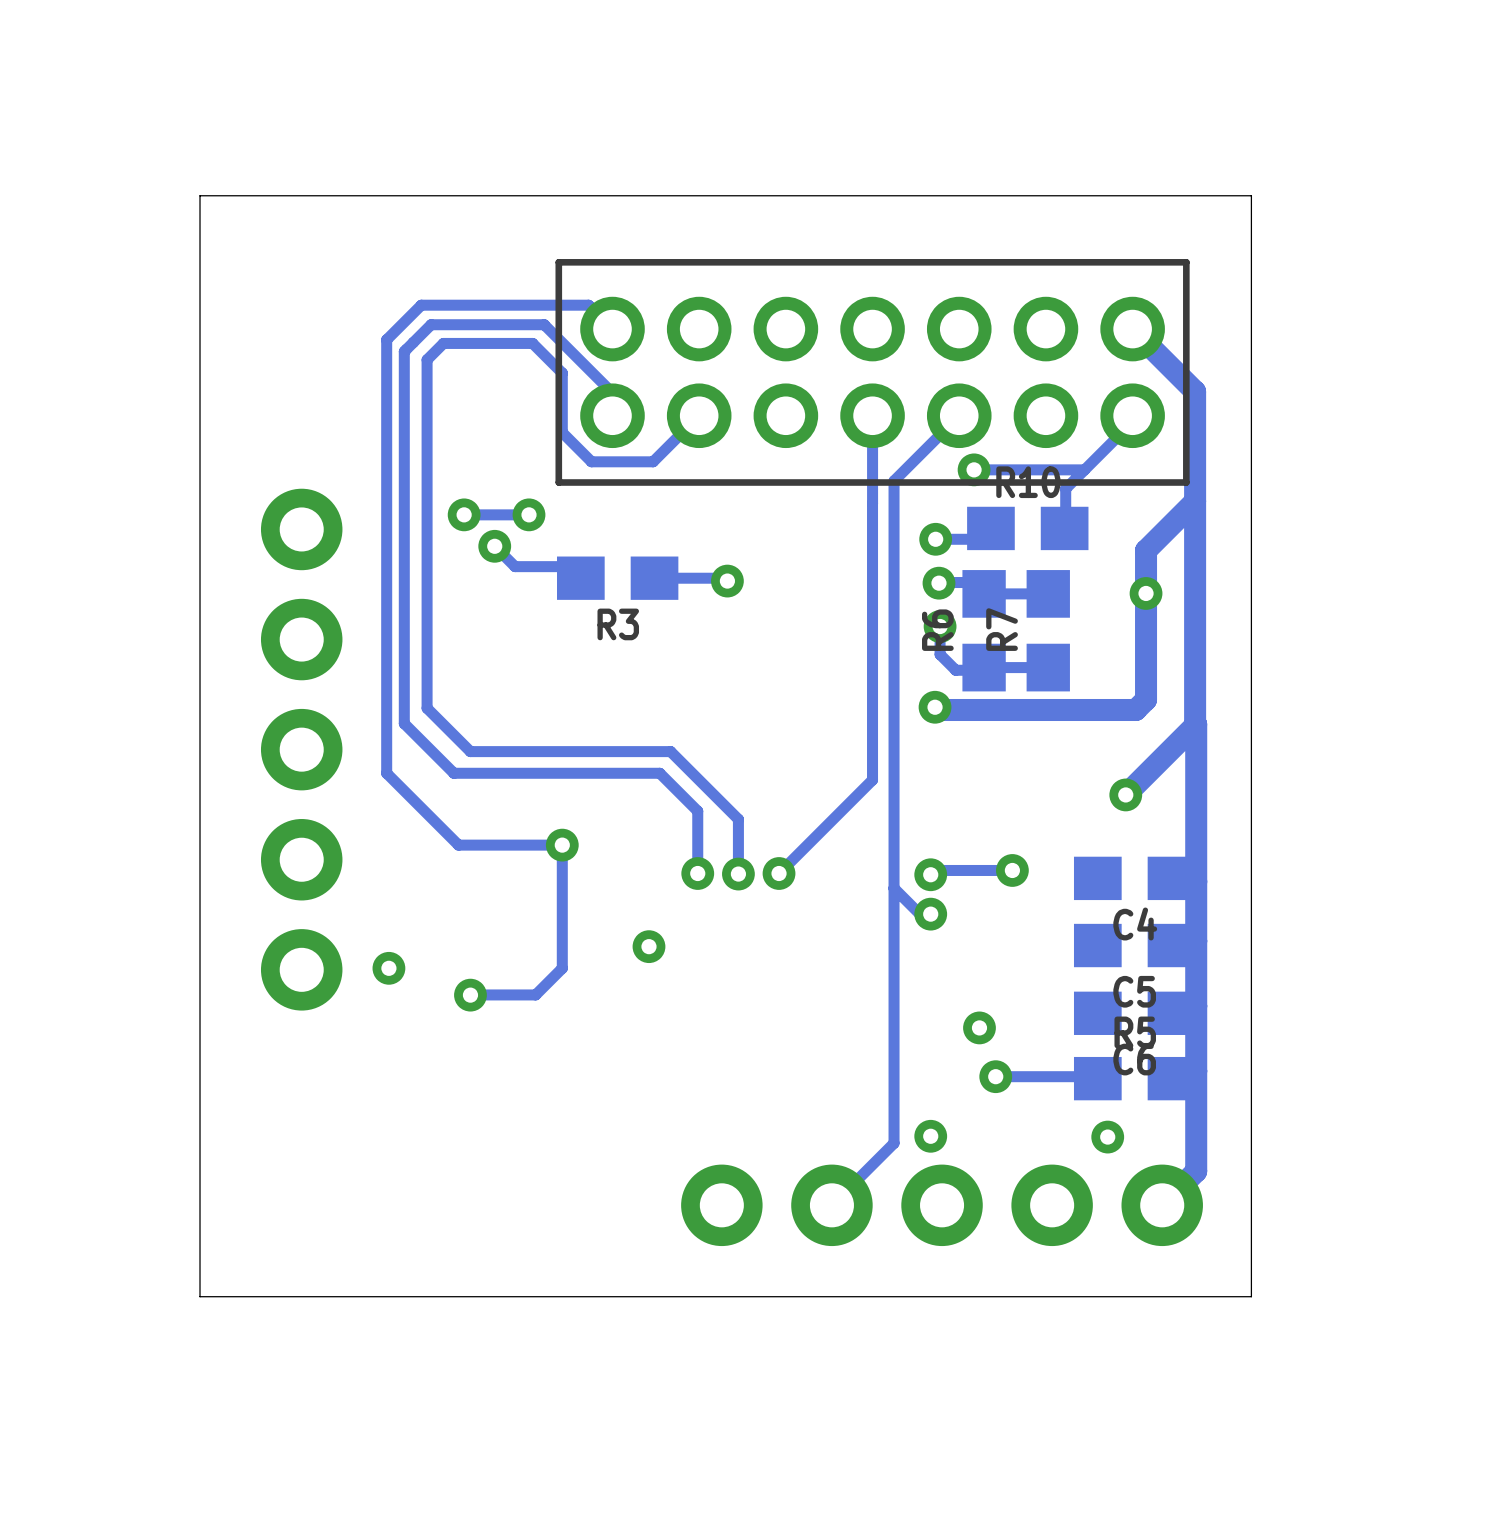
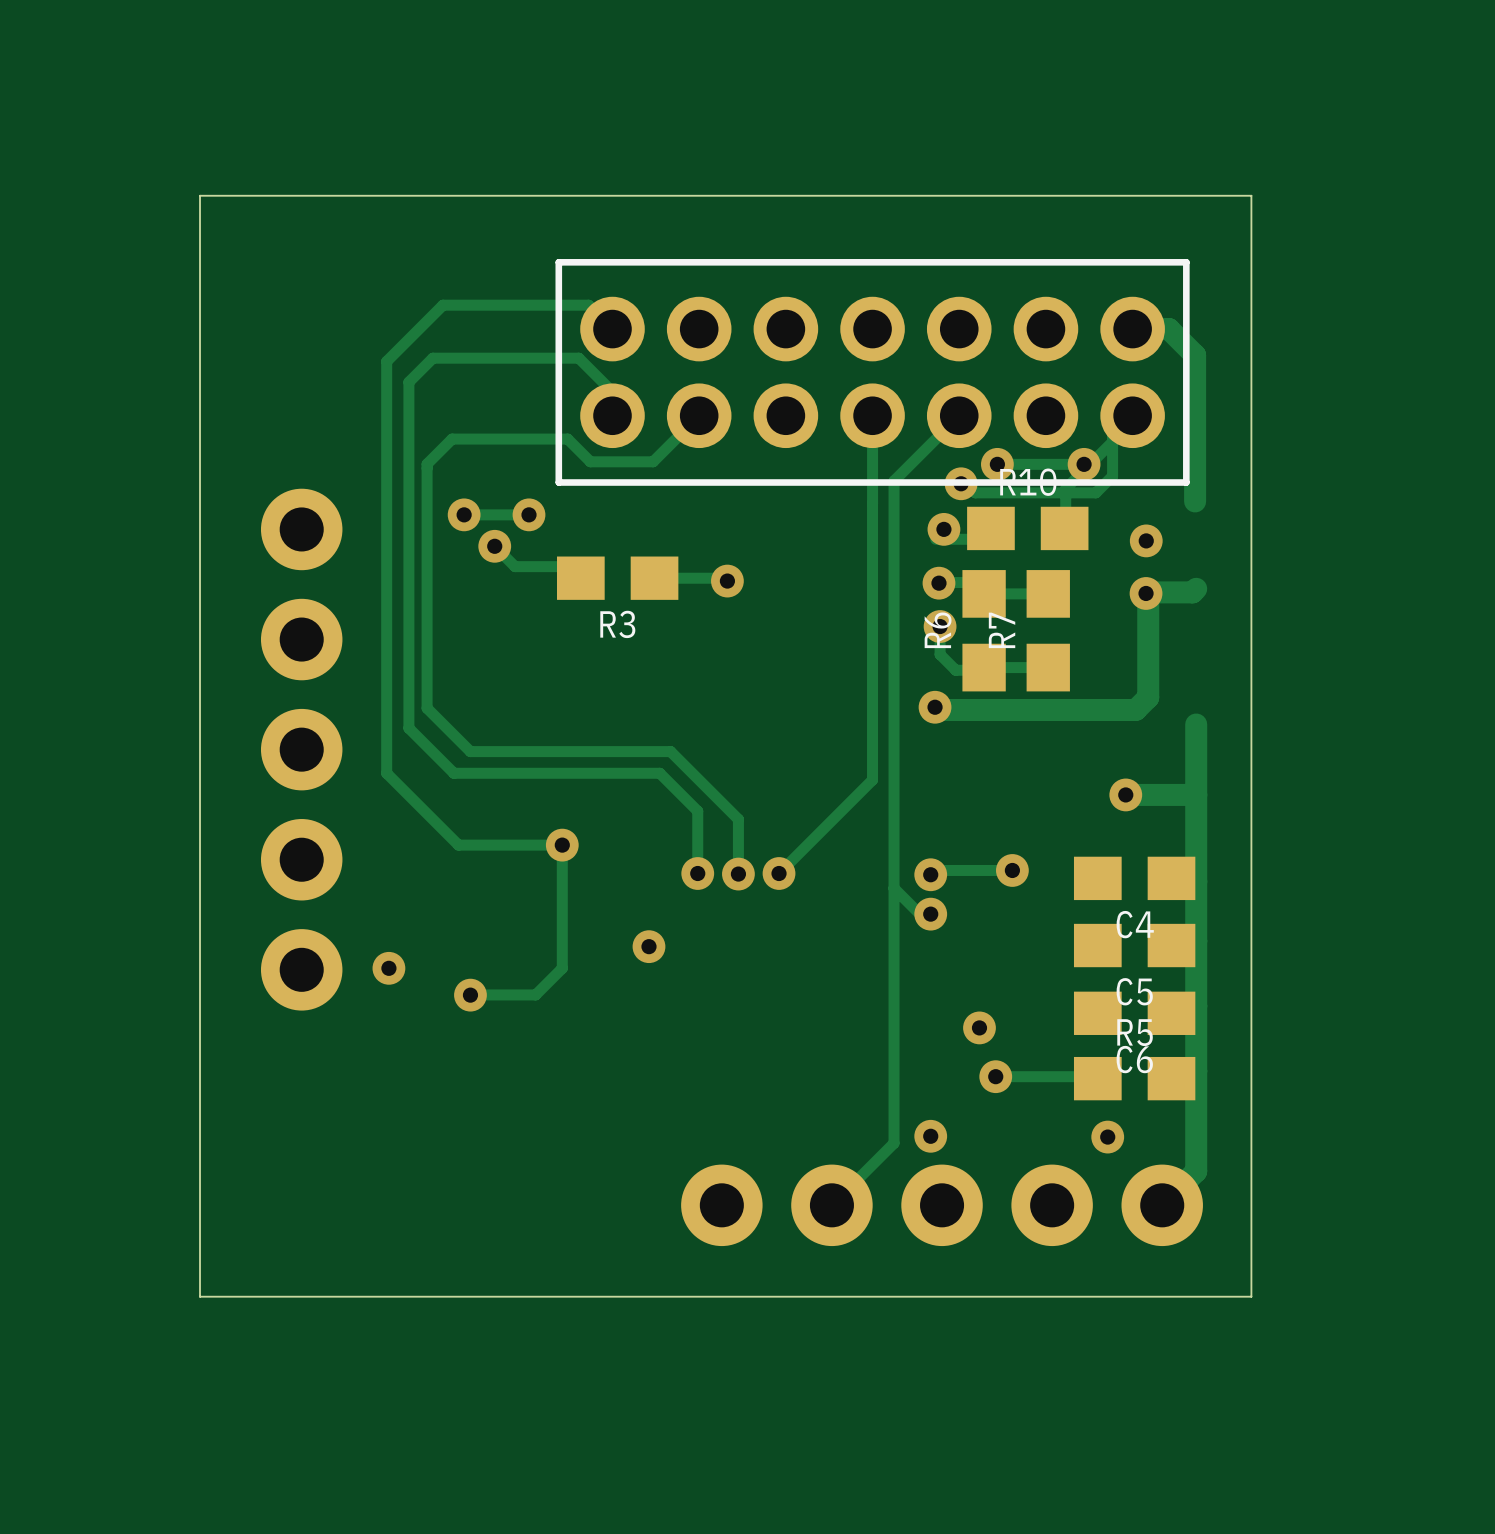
track: (443, 305) (421, 305) (386, 339) (386, 361) -> (443, 305) (386, 361)
track: (1132, 329) (1195, 391) -> (1132, 329) (1168, 329) (1195, 355) (1195, 391)
track: (612, 392) (544, 324) (431, 324) (404, 351) (404, 723) (408, 728) -> (612, 392) (578, 358) (432, 358) (408, 382) (408, 728)
track: none -> (1132, 415) (1112, 435) (1112, 476) (1095, 492) (975, 492) (966, 483) (961, 483)
track: (591, 461) (562, 432) (562, 373) (532, 343) (443, 343) (427, 359) (427, 464) -> (591, 461) (567, 439) (452, 439) (427, 464)
via: none -> (997, 464)
track: none -> (1084, 464) (997, 464)
via: none -> (1084, 464)
via: (974, 469) -> none
track: (1084, 469) (974, 469) -> none
via: none -> (961, 483)
via position: (935, 539) -> (943, 529)
via: none -> (1146, 540)
track: (1146, 699) (1146, 550) (1195, 501) (1195, 725) -> (1146, 699) (1148, 697) (1148, 592) (1192, 592) (1196, 588)
track: (1196, 724) (1125, 794) -> (1196, 794) (1125, 794)

